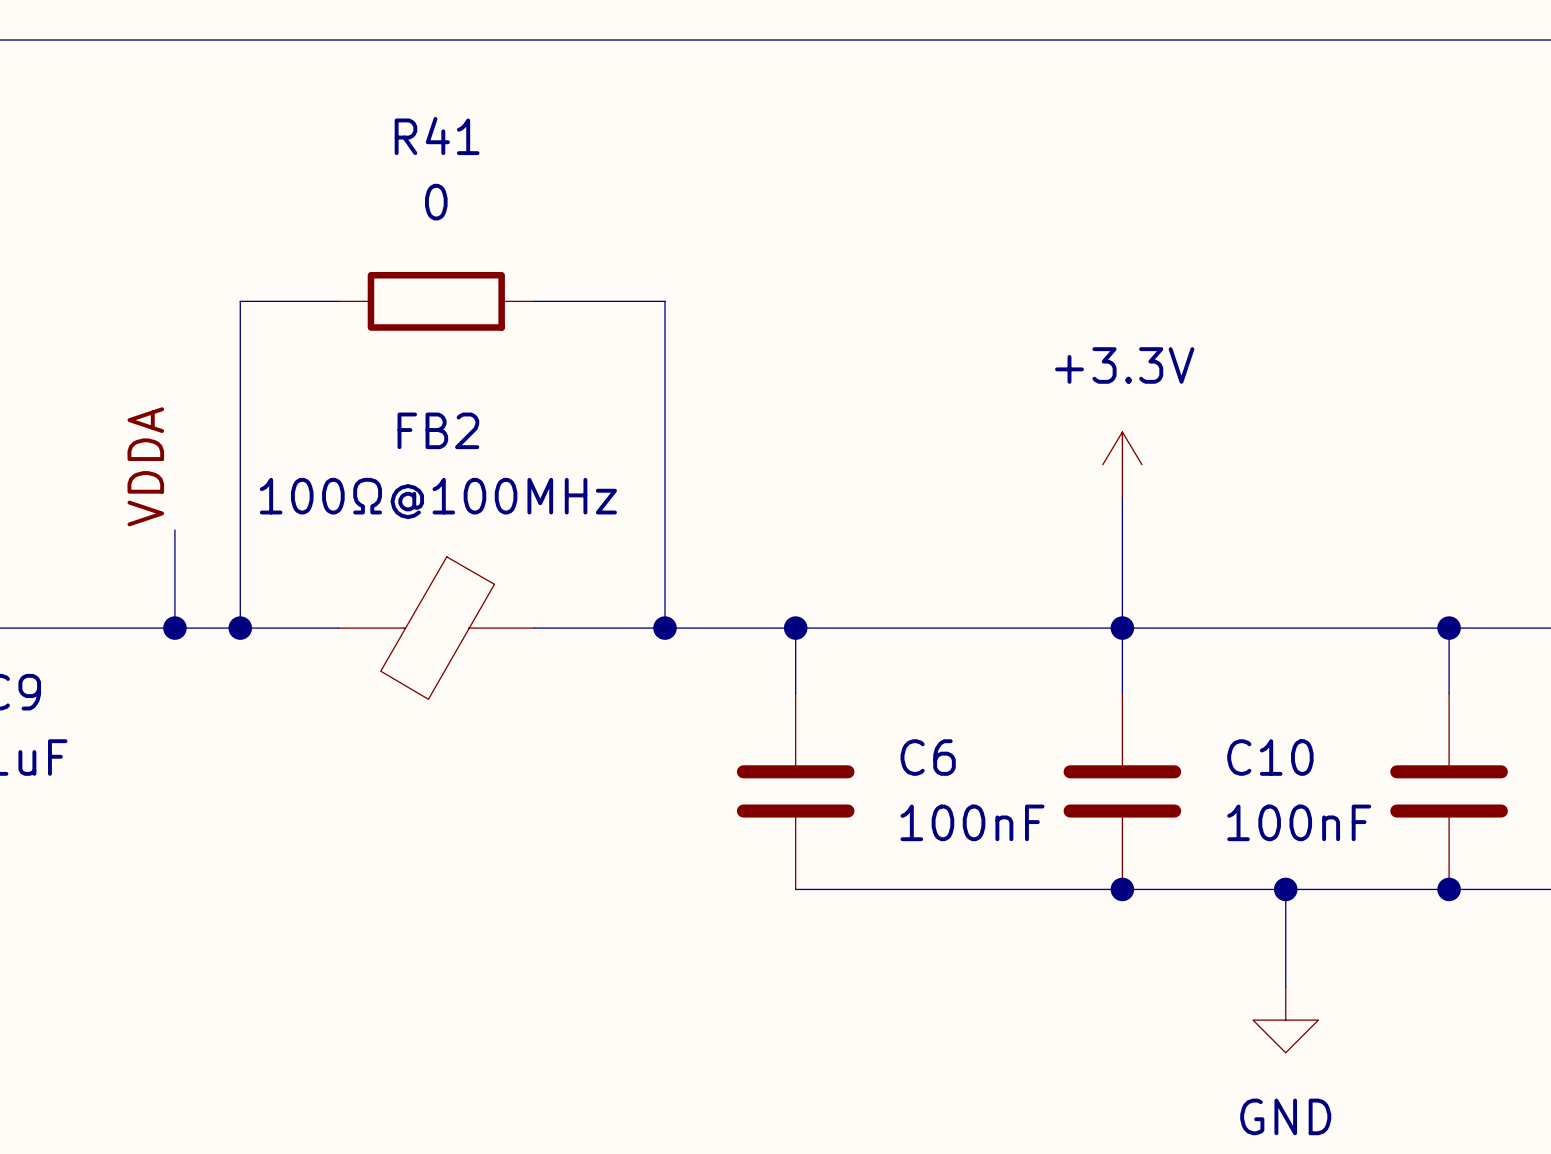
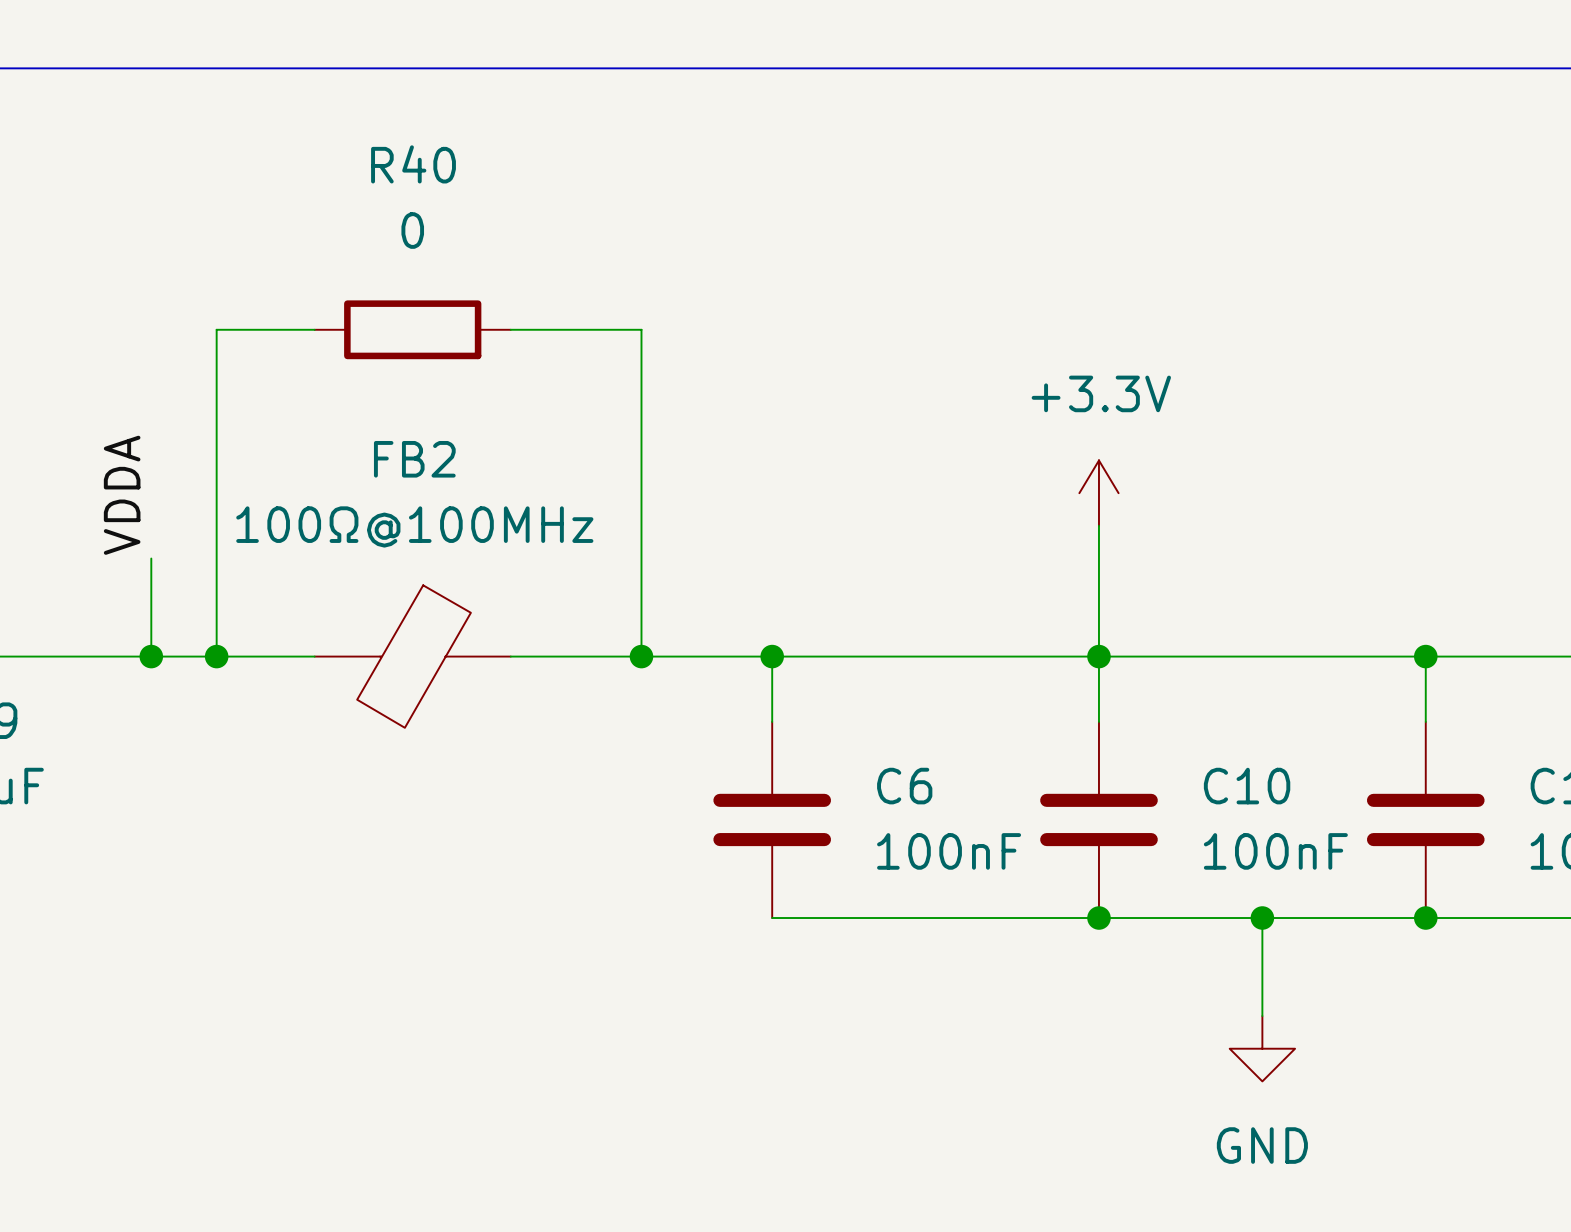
R41 name: R41 (437, 136) -> R40 (413, 164)

